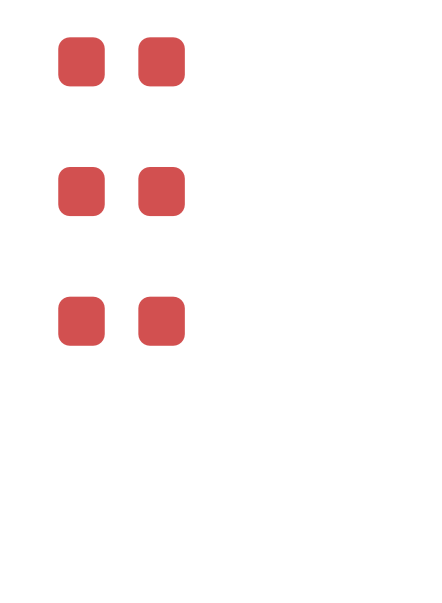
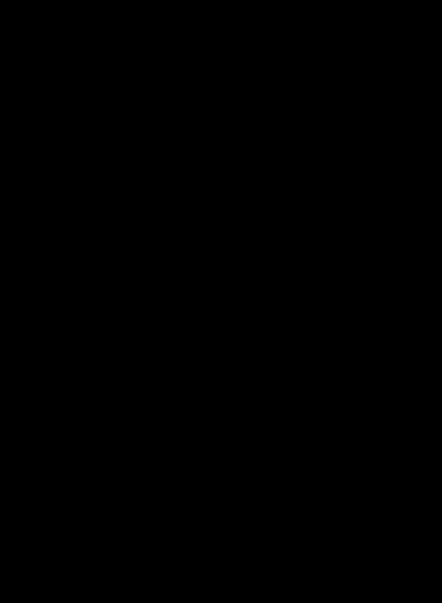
part: (121, 61) -> none
part: (121, 191) -> none
part: (121, 321) -> none

